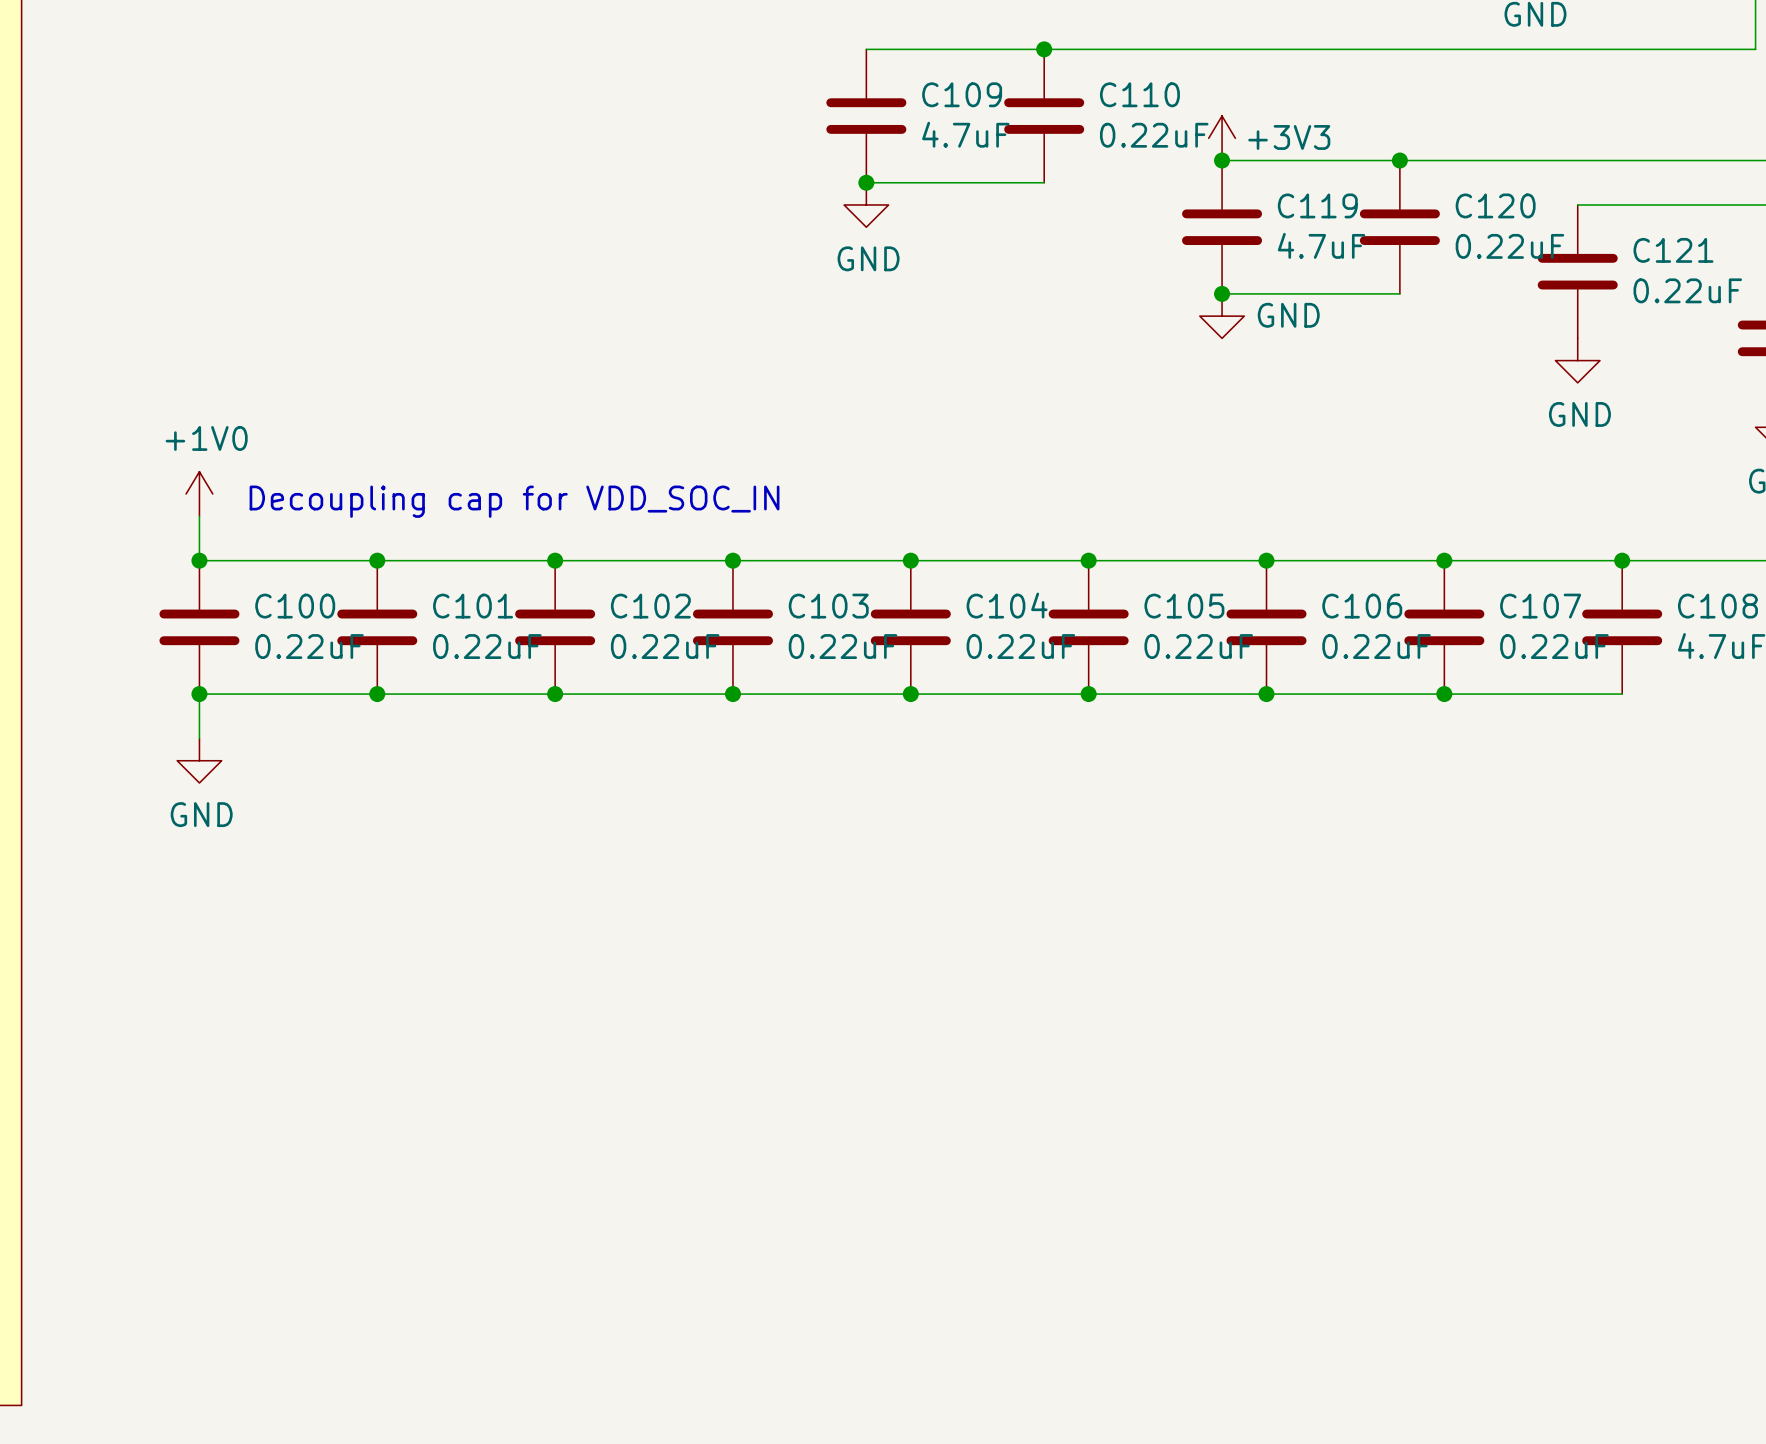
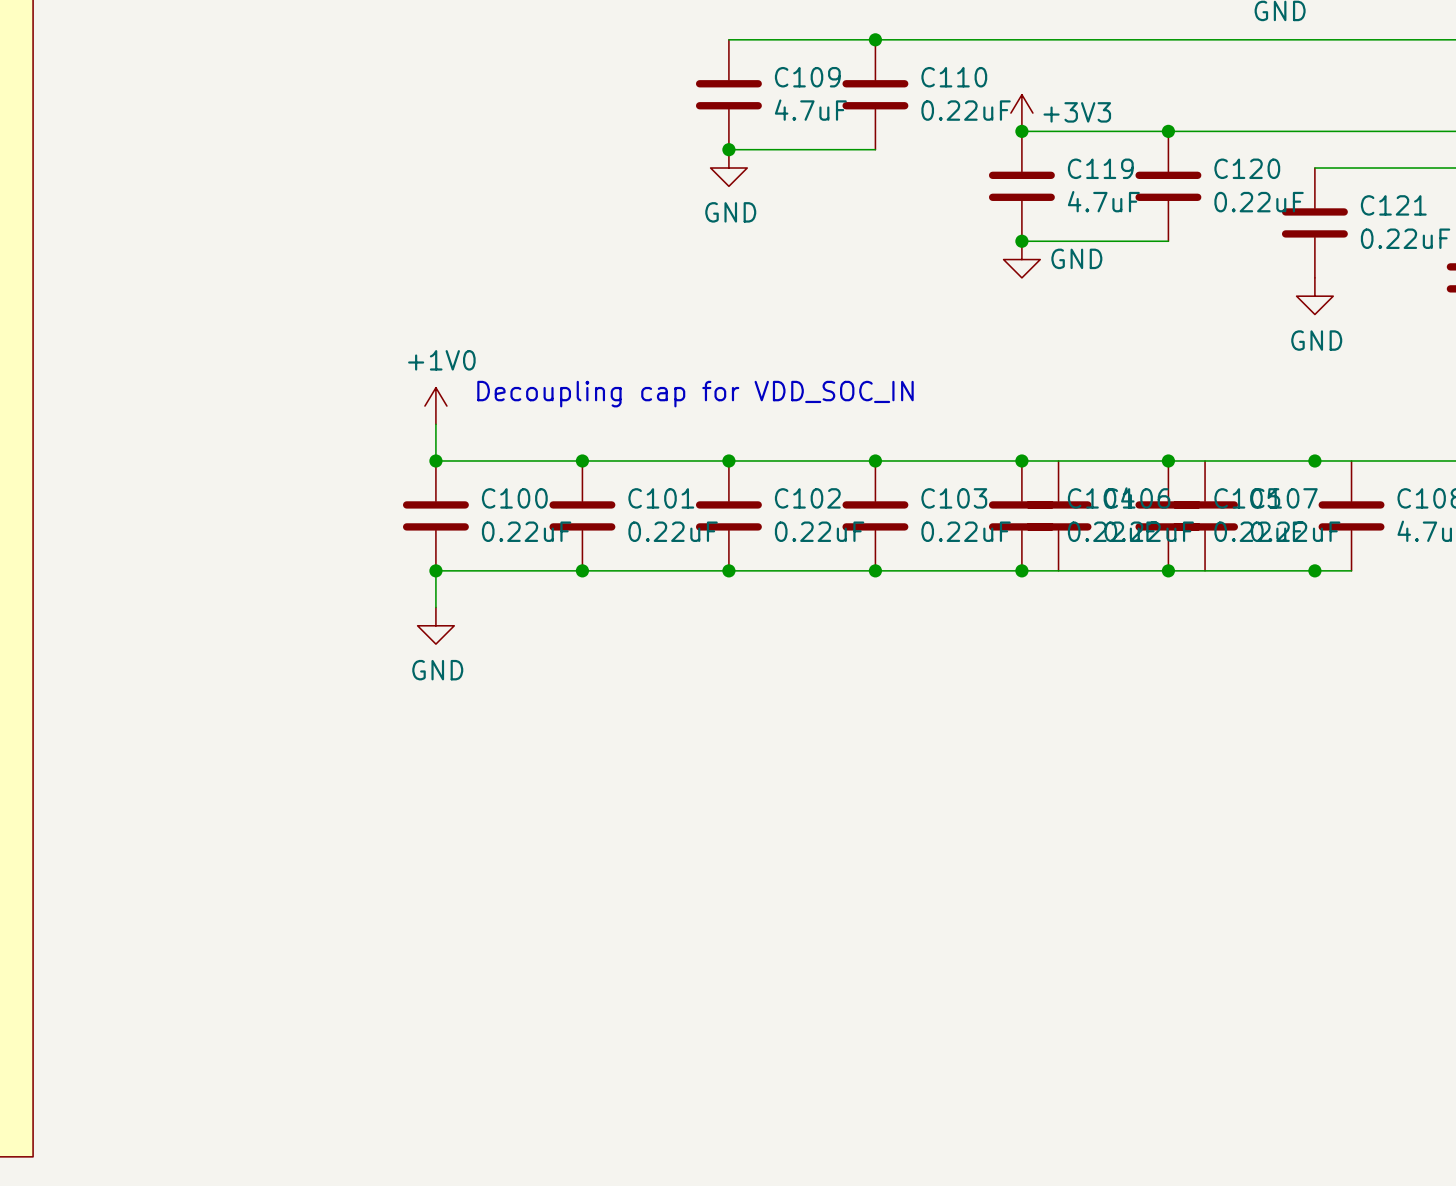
power symbol position: +1V0 (199, 493) -> +1V0 (435, 406)
text position: Decoupling cap for VDD_SOC_IN (514, 501) -> Decoupling cap for VDD_SOC_IN (695, 394)
wire: (199, 516) (199, 560) (510, 560) -> (435, 424) (435, 460)
junction: (199, 560) -> none
junction: (377, 560) -> none
junction position: (555, 560) -> (435, 460)
junction position: (732, 560) -> (582, 460)
junction position: (910, 560) -> (728, 460)
junction position: (1088, 560) -> (875, 460)
junction position: (1266, 560) -> (1021, 460)
junction position: (1444, 560) -> (1168, 460)
junction position: (1622, 560) -> (1314, 460)
C100 position: (199, 627) -> (435, 515)
C101 position: (377, 627) -> (582, 515)
C102 position: (555, 627) -> (728, 515)
C103 position: (732, 627) -> (875, 515)
C104 position: (910, 627) -> (1021, 515)
C105 position: (1088, 627) -> (1168, 515)
junction: (199, 694) -> none
junction: (377, 694) -> none
wire: (510, 694) (199, 694) (199, 738) -> (435, 570) (435, 607)
junction position: (555, 694) -> (435, 570)
junction position: (732, 694) -> (582, 570)
junction position: (910, 694) -> (728, 570)
junction position: (1088, 694) -> (875, 570)
junction position: (1266, 694) -> (1021, 570)
junction position: (1444, 694) -> (1168, 570)
junction: none -> (1314, 570)
power symbol position: GND (199, 760) -> GND (435, 625)

